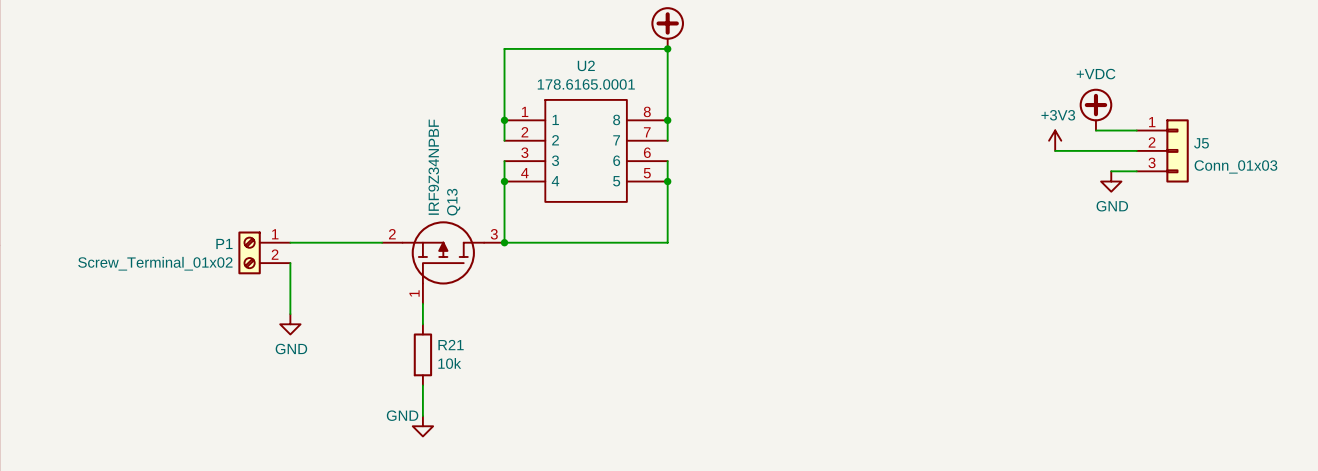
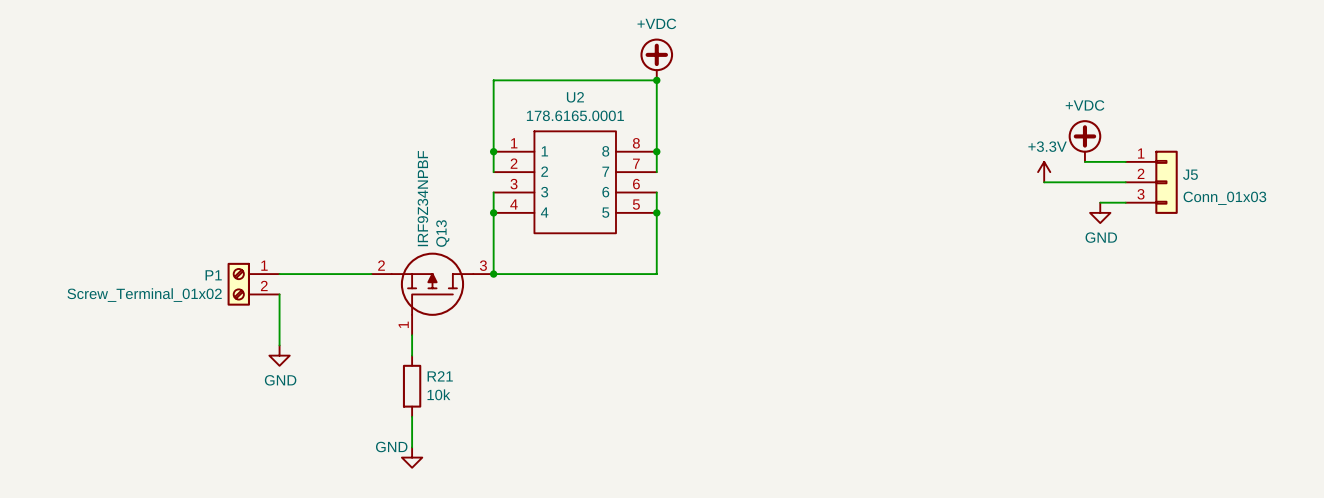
power symbol: +3V3 (1055, 140) -> +3.3V (1044, 172)

